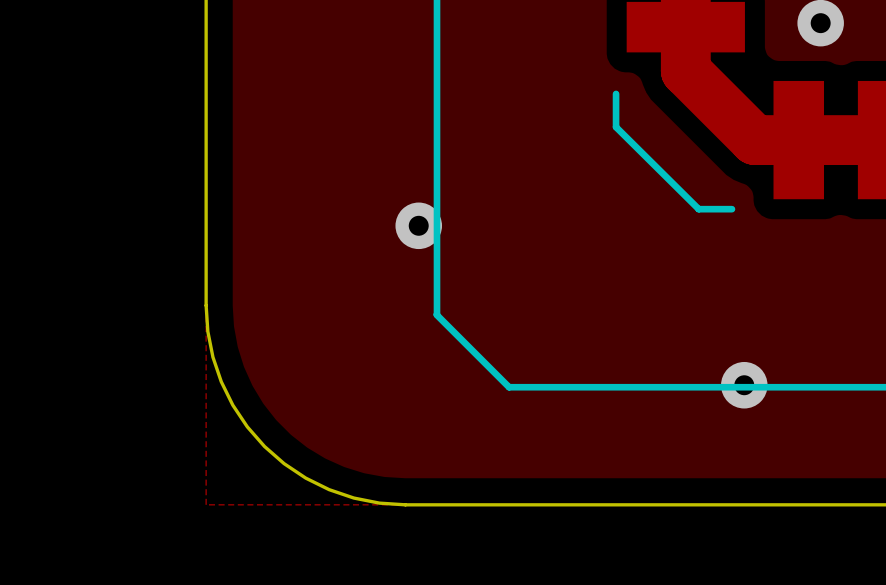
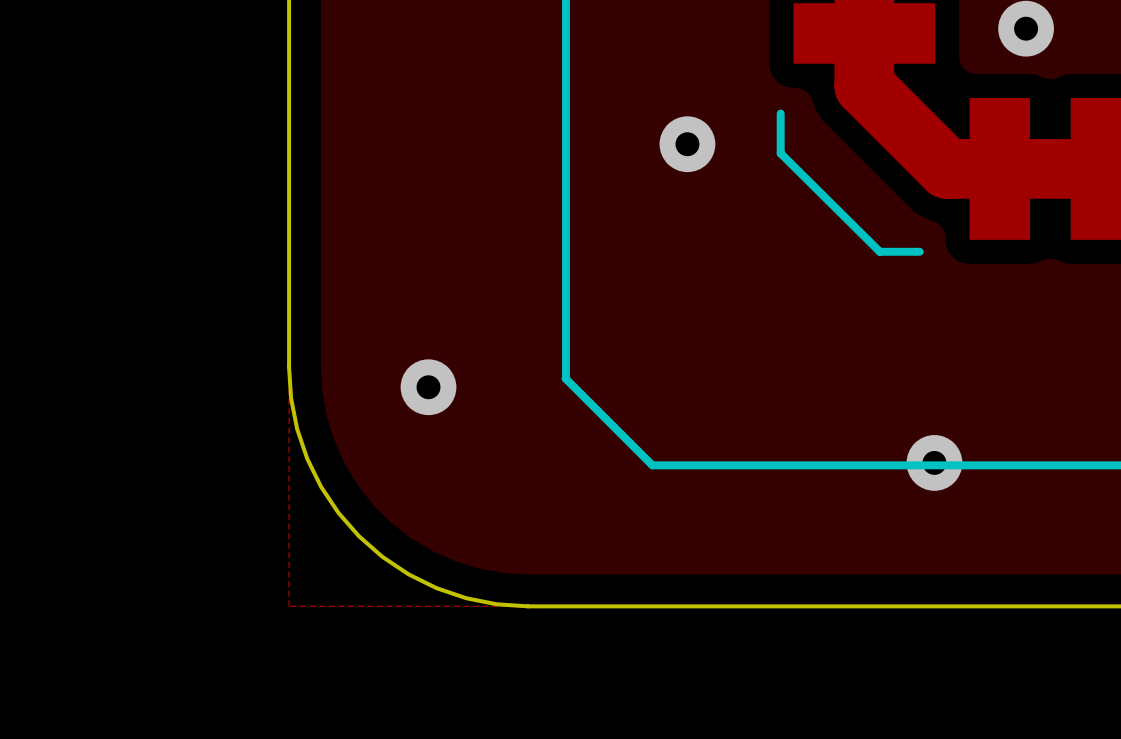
via: none -> (687, 144)
via: (418, 225) -> none
via: none -> (428, 387)

